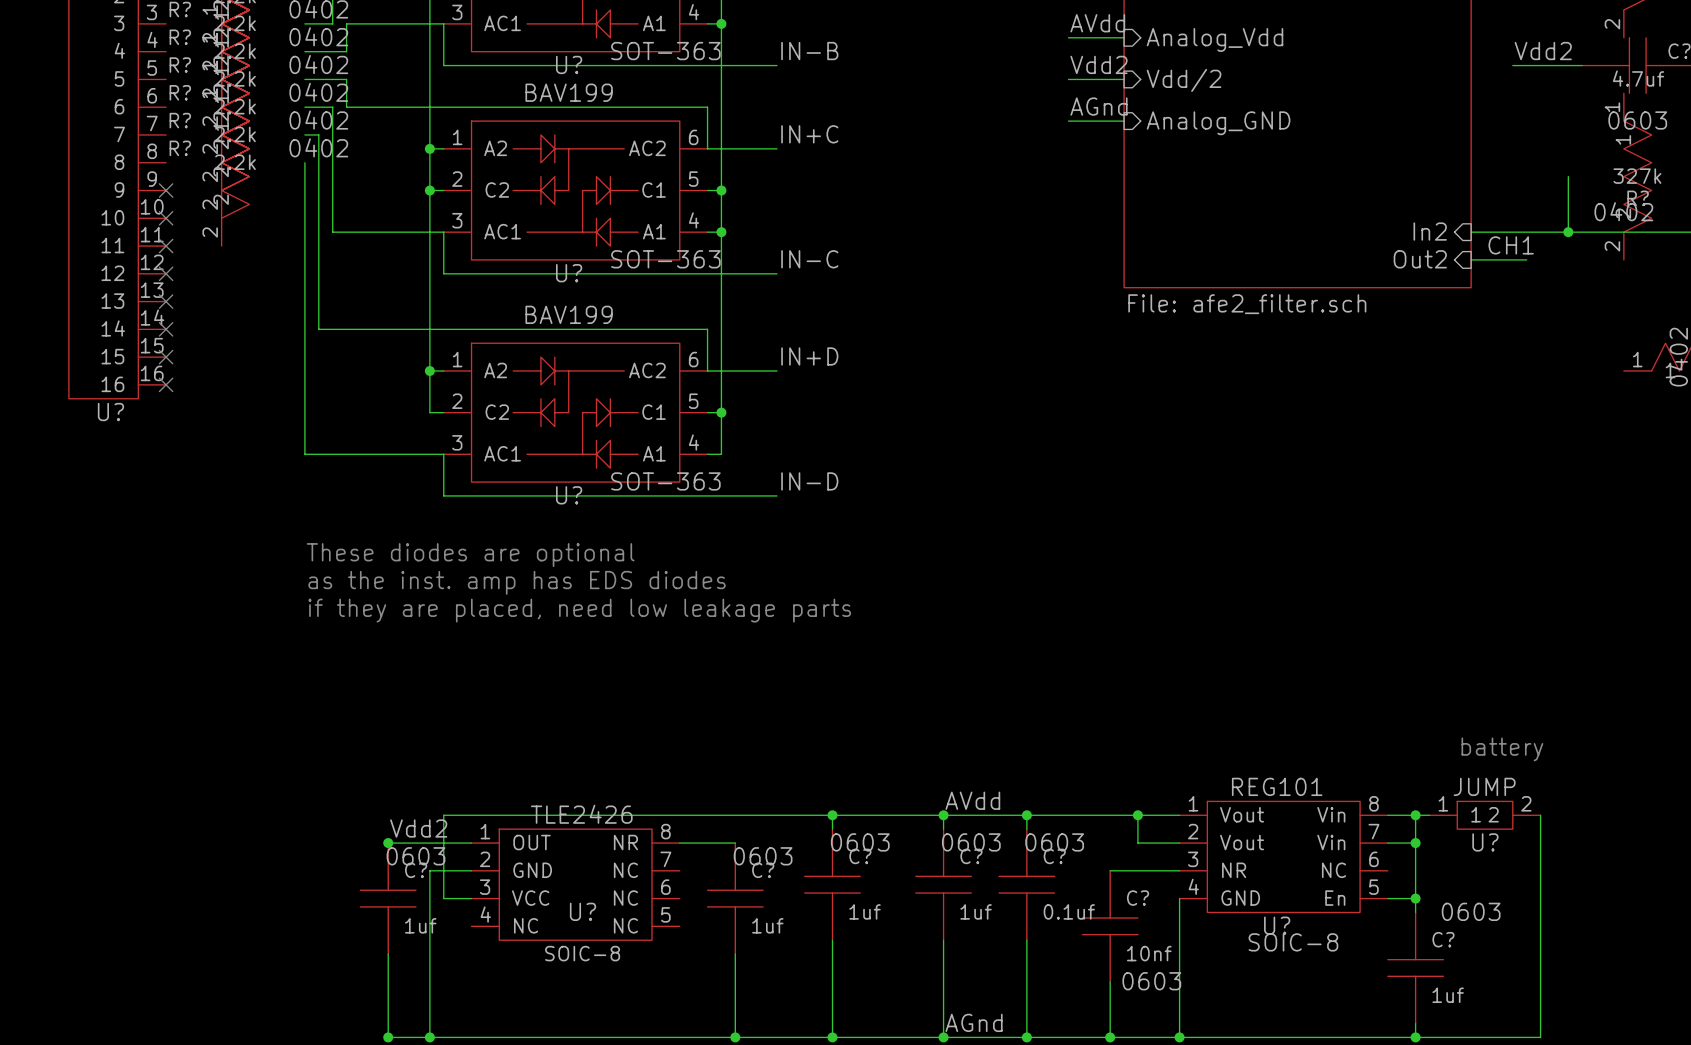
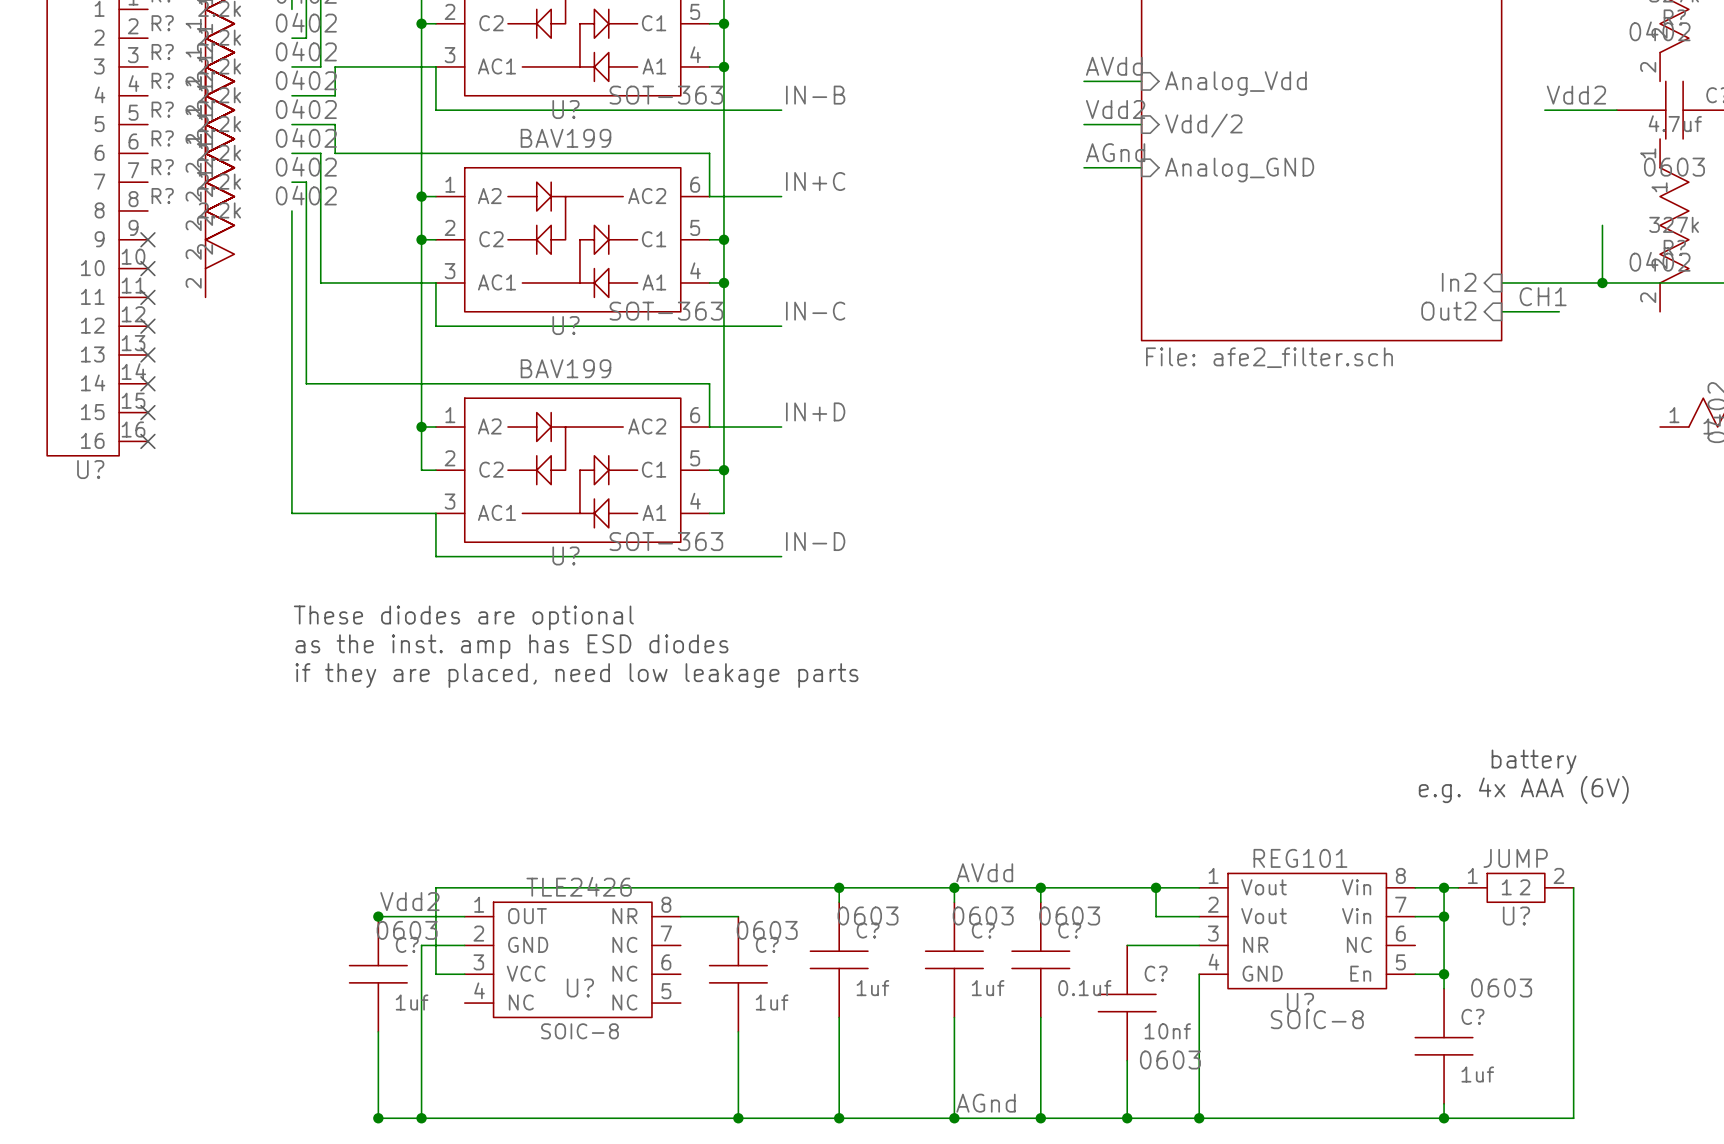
text: as the inst. amp has EDS diodes (517, 582) -> as the inst. amp has ESD diodes (511, 646)
text: none -> e.g. 4x AAA (6V) (1523, 789)
text position: battery (1502, 749) -> battery (1534, 761)

